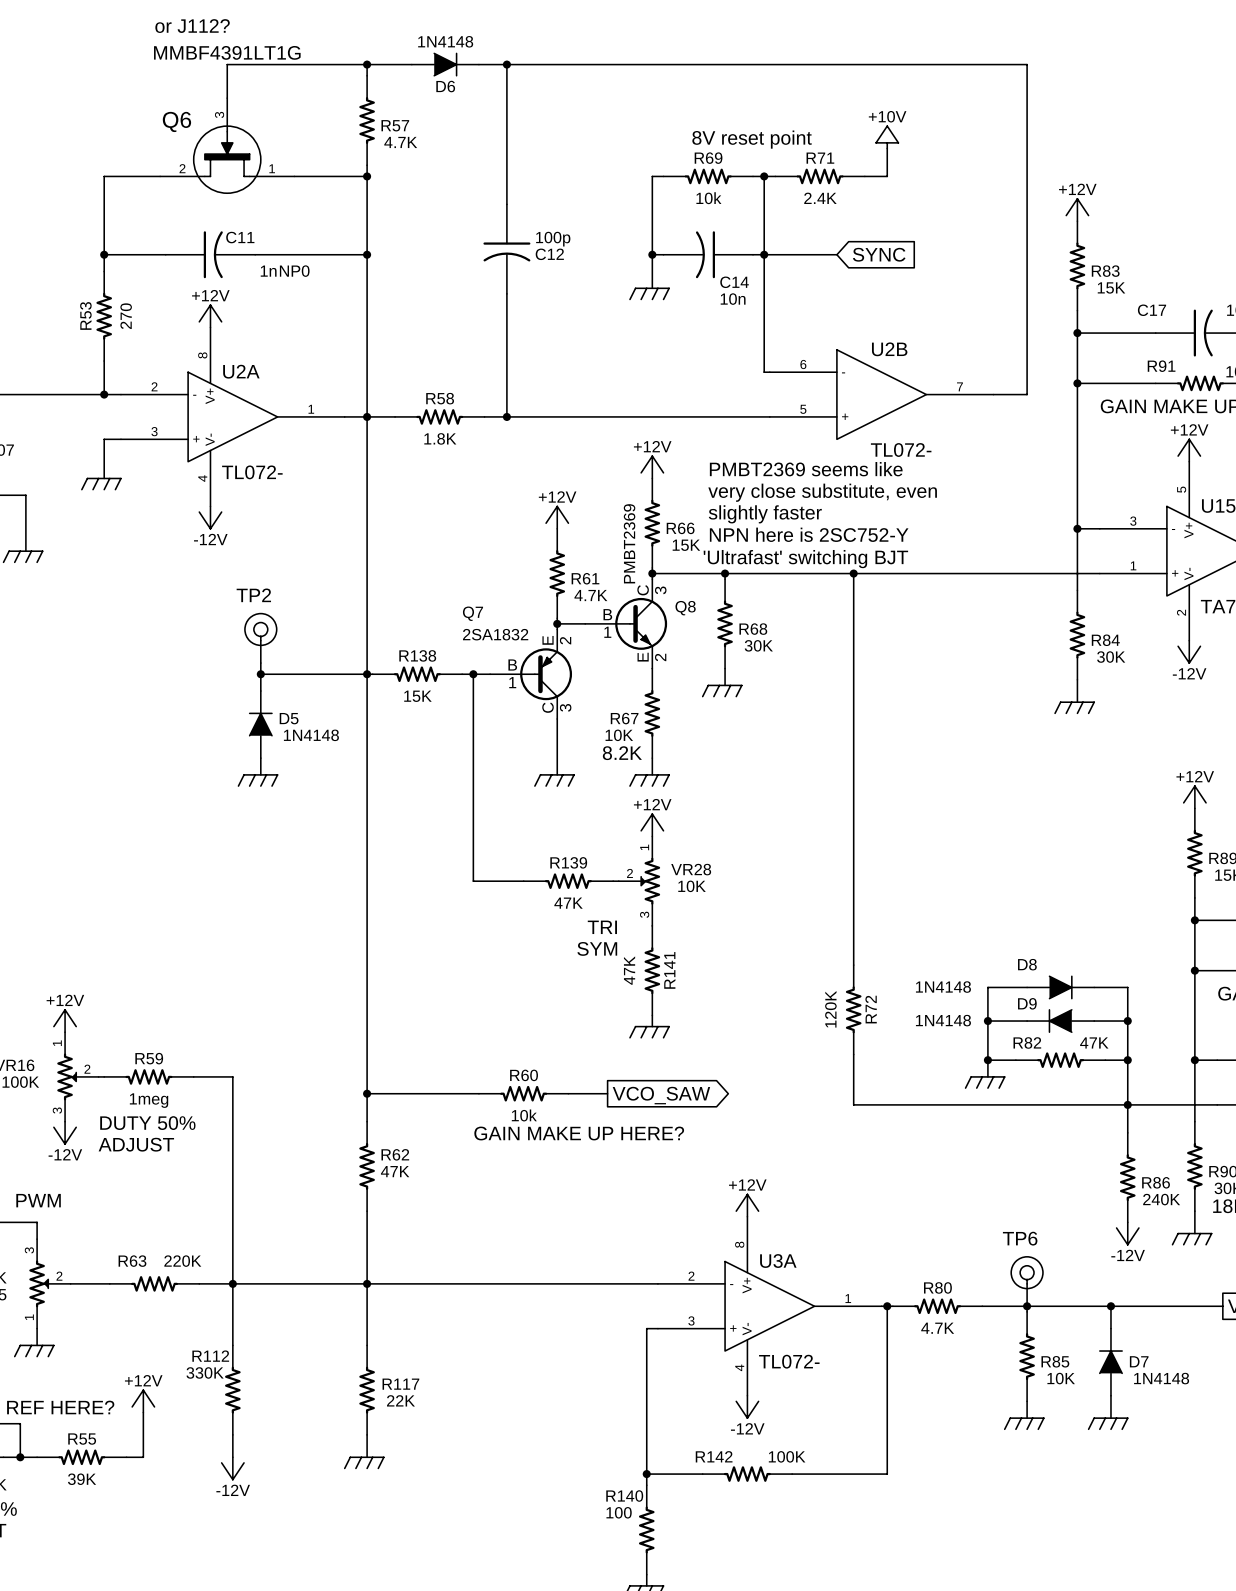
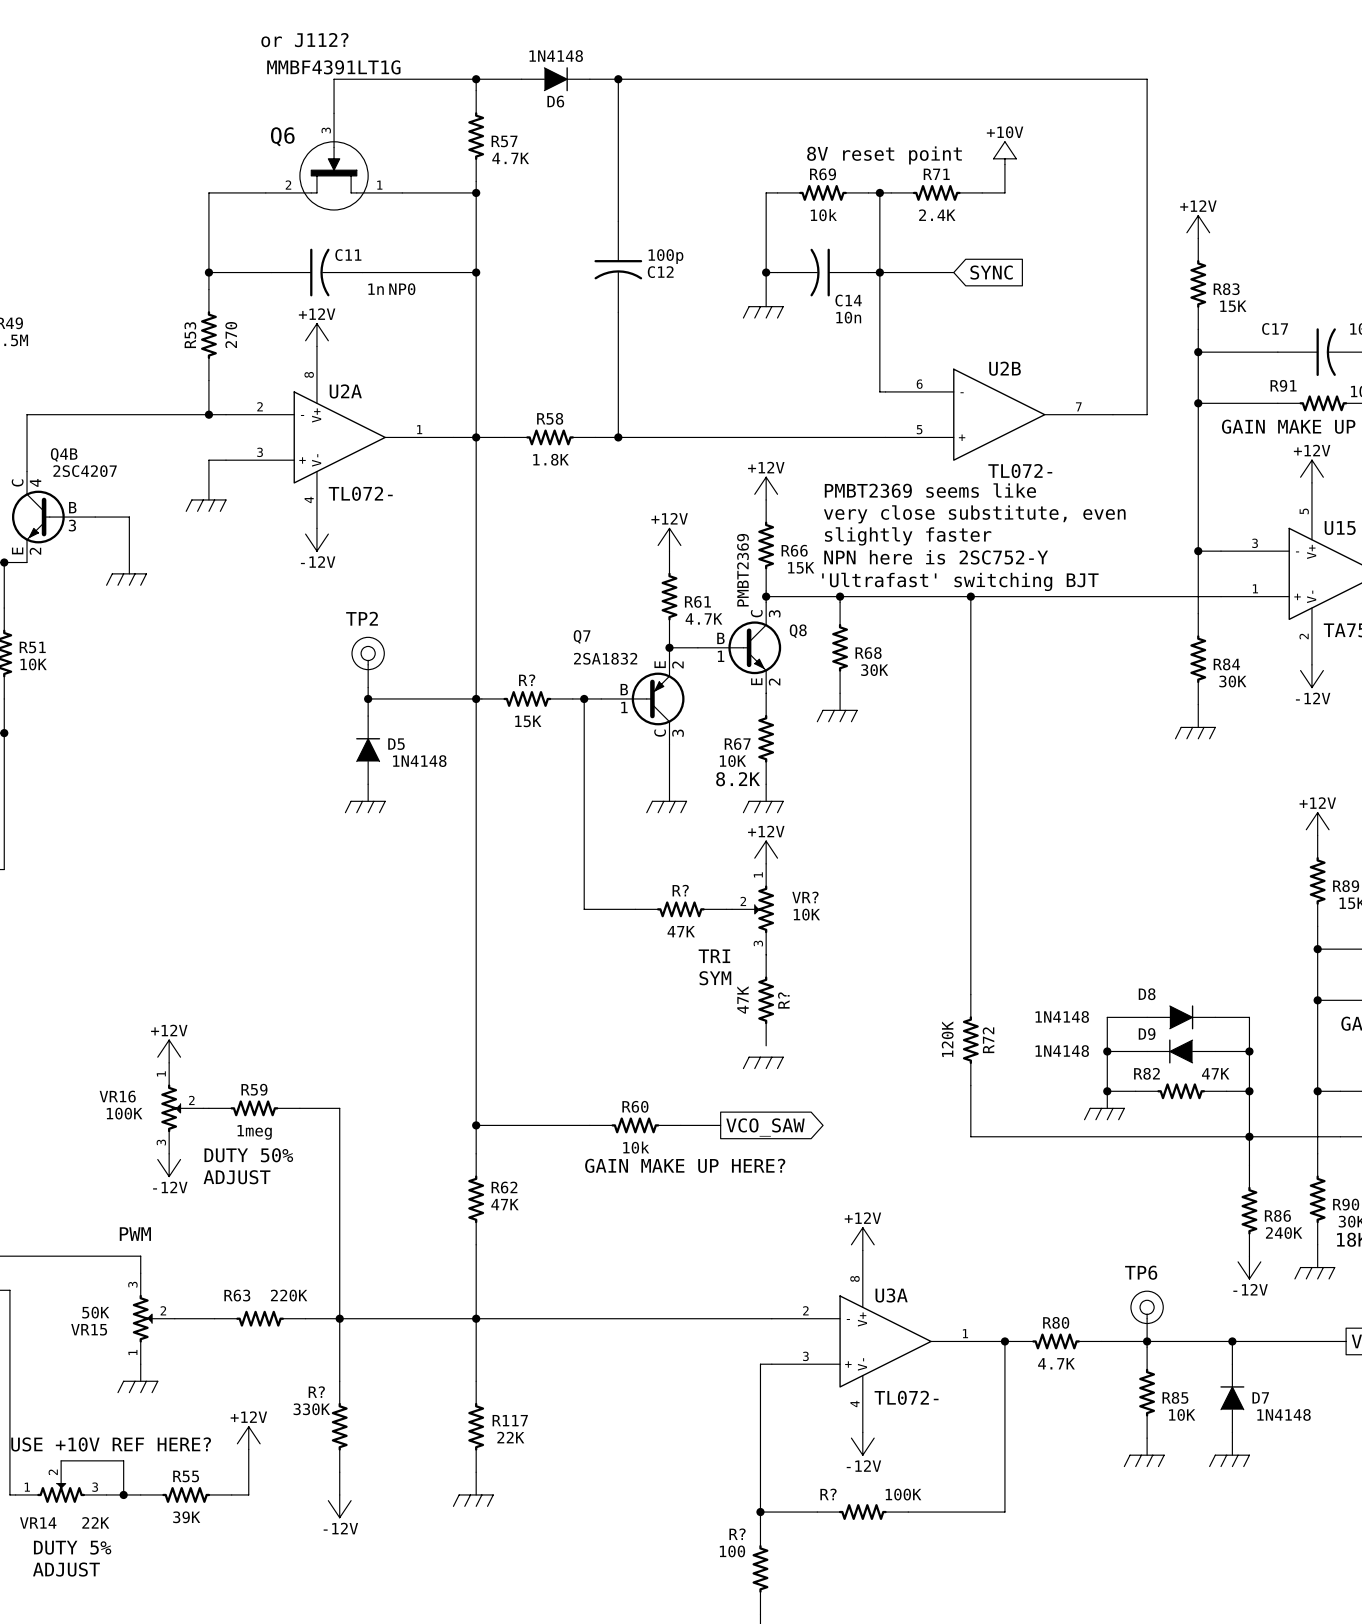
R138 name: R138 (417, 655) -> R? (527, 680)
R139 name: R139 (568, 862) -> R? (680, 890)
VR28 name: VR28 (691, 869) -> VR? (805, 897)
R141 name: R141 (669, 970) -> R? (783, 1000)
wire: (652, 1015) (652, 1026) -> none
R112 name: R112 (210, 1356) -> R? (316, 1392)
R142 name: R142 (714, 1456) -> R? (828, 1494)
R140 name: R140 (624, 1496) -> R? (737, 1534)

